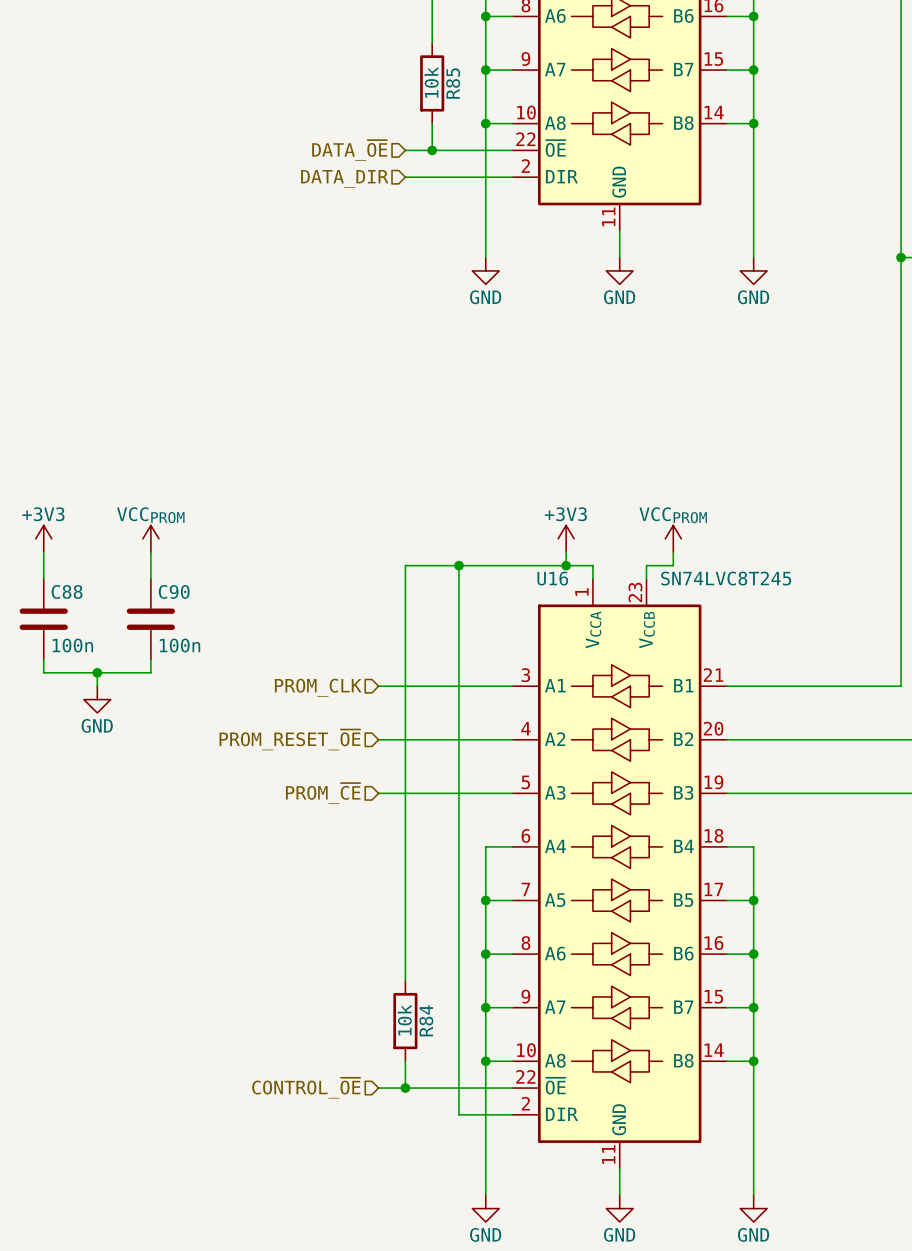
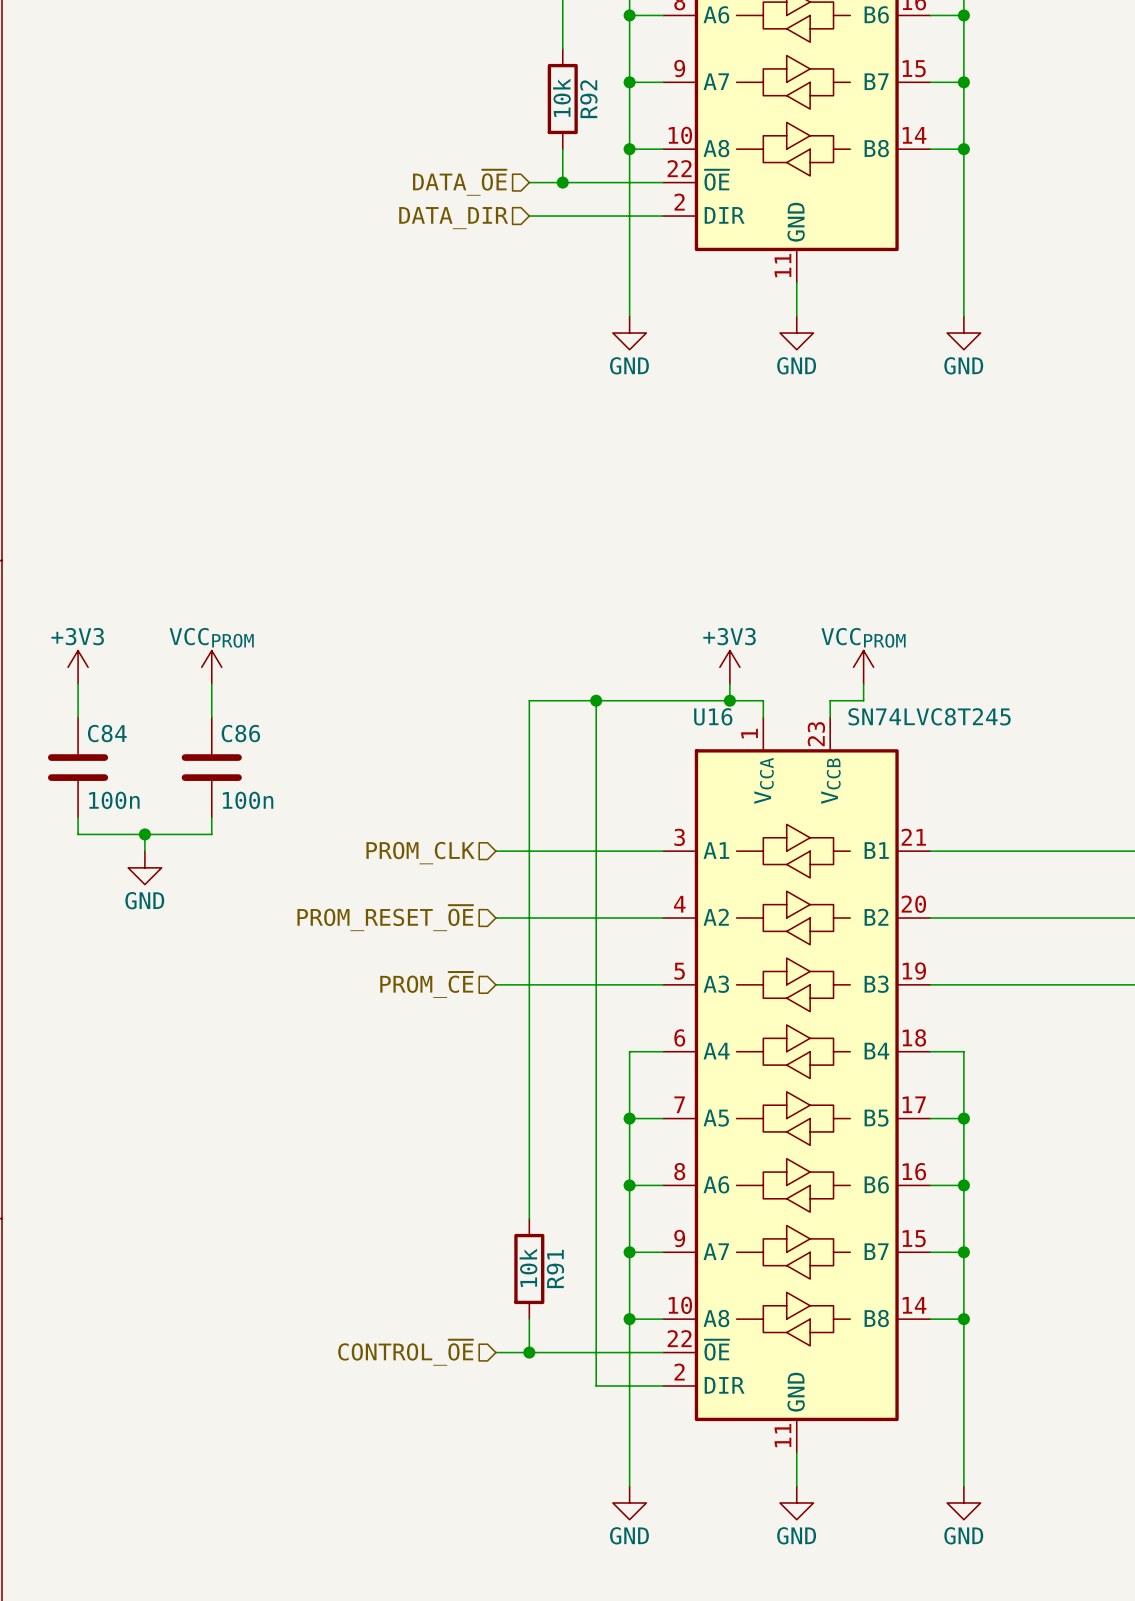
R85 name: R85 (453, 83) -> R92 (588, 99)
C88 name: C88 (67, 591) -> C84 (107, 733)
C90 name: C90 (174, 591) -> C86 (240, 733)
R84 name: R84 (426, 1020) -> R91 (555, 1268)

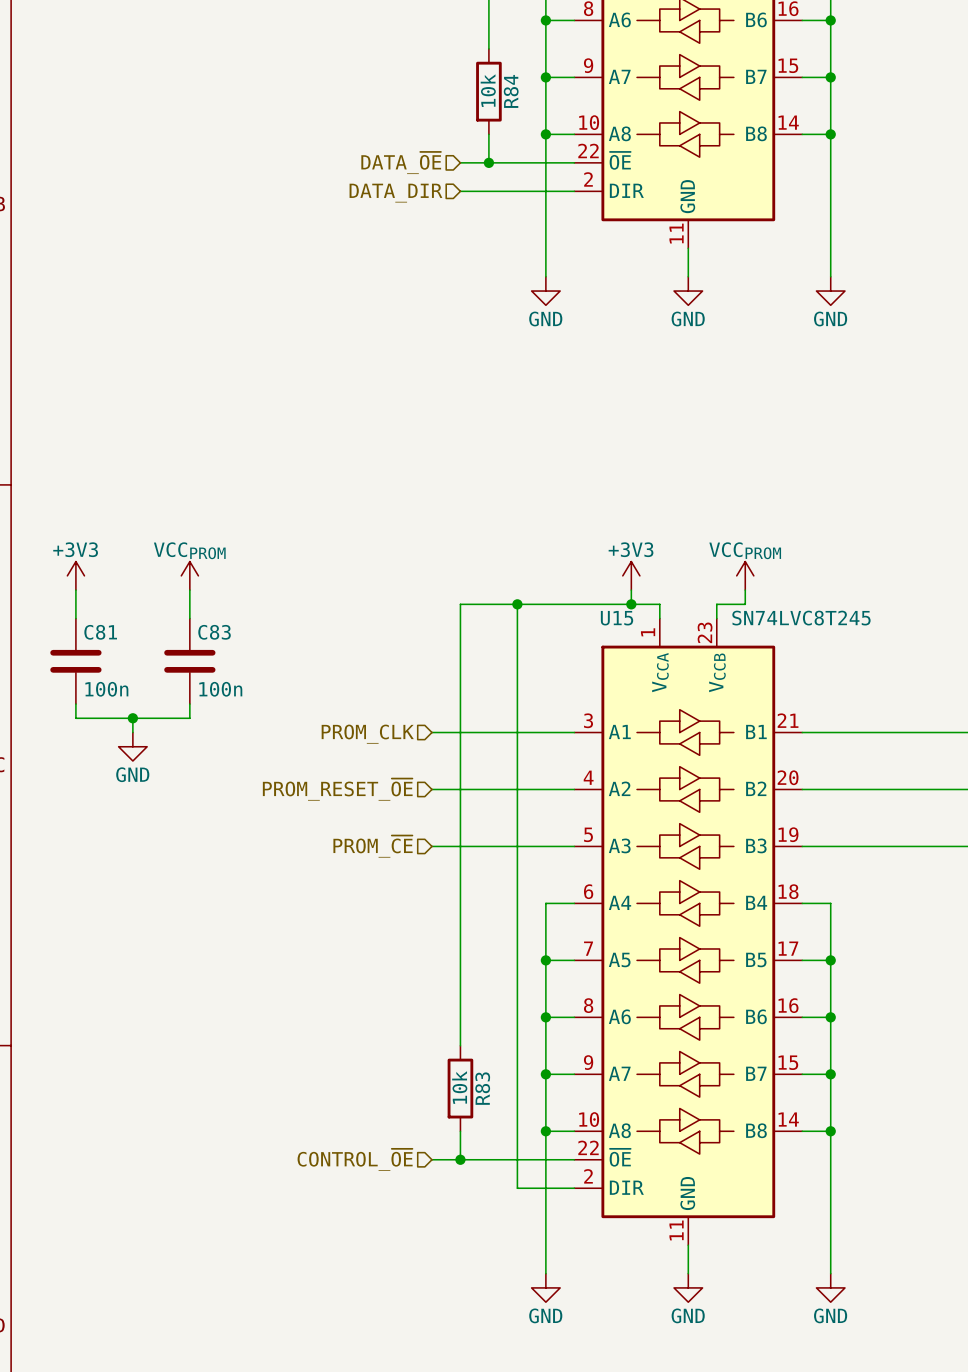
R92 name: R92 (588, 99) -> R84 (511, 91)
U16 name: U16 (713, 716) -> U15 (617, 618)
C84 name: C84 (107, 733) -> C81 (100, 632)
C86 name: C86 (240, 733) -> C83 (214, 632)
R91 name: R91 (555, 1268) -> R83 (482, 1088)

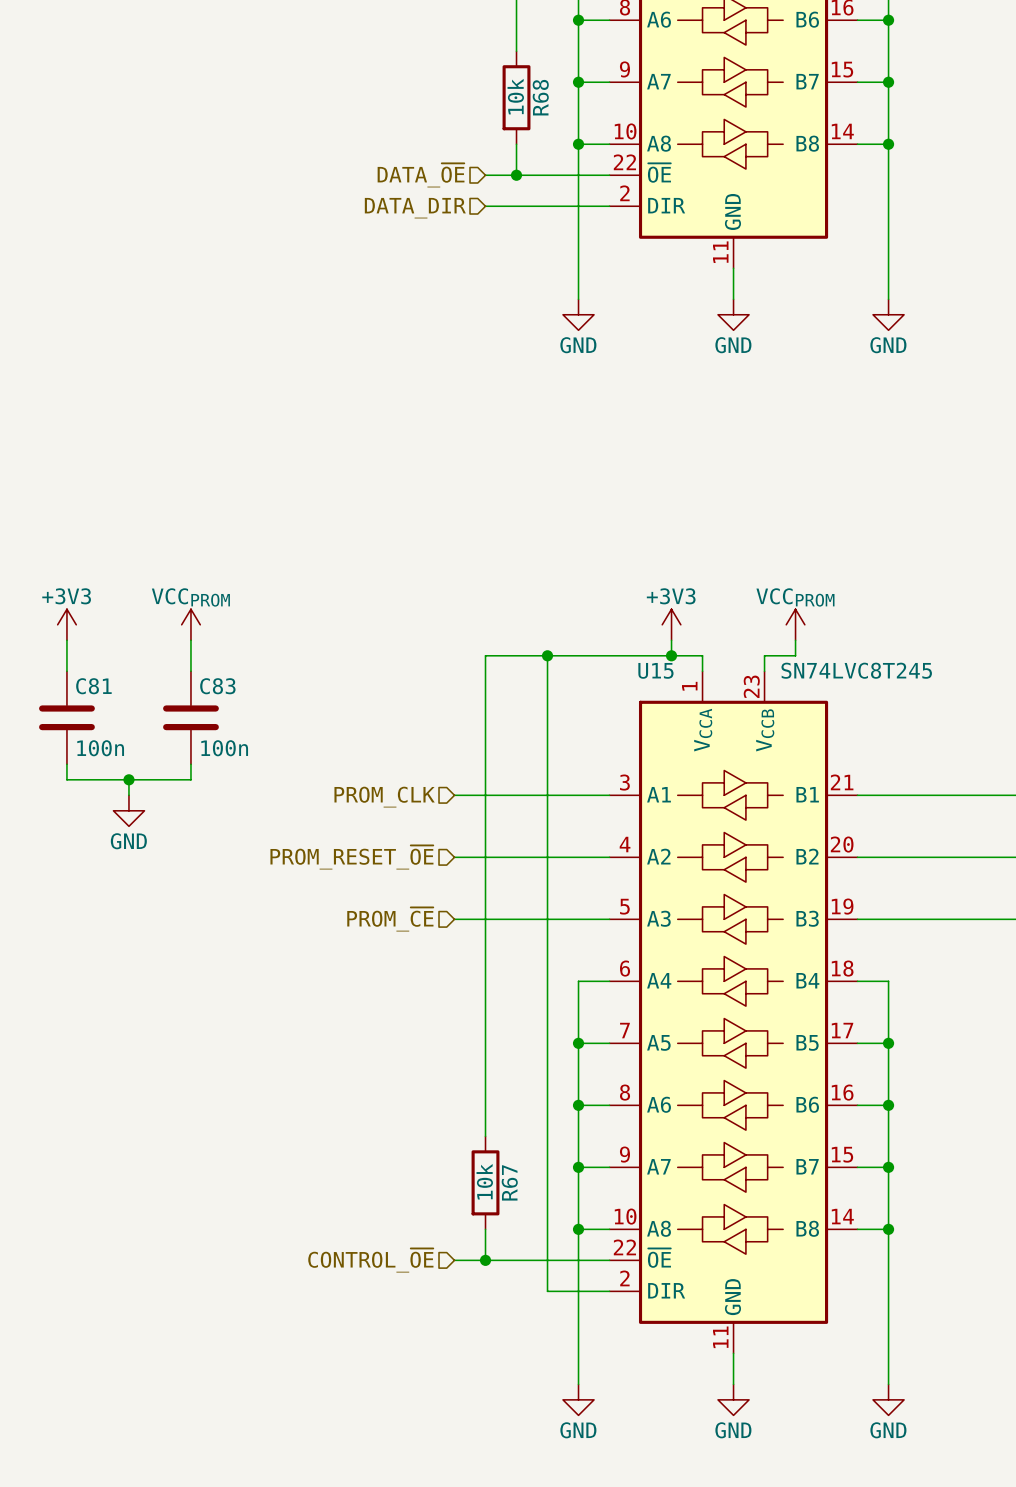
R84 name: R84 (511, 91) -> R68 (540, 97)
R83 name: R83 (482, 1088) -> R67 (509, 1182)

